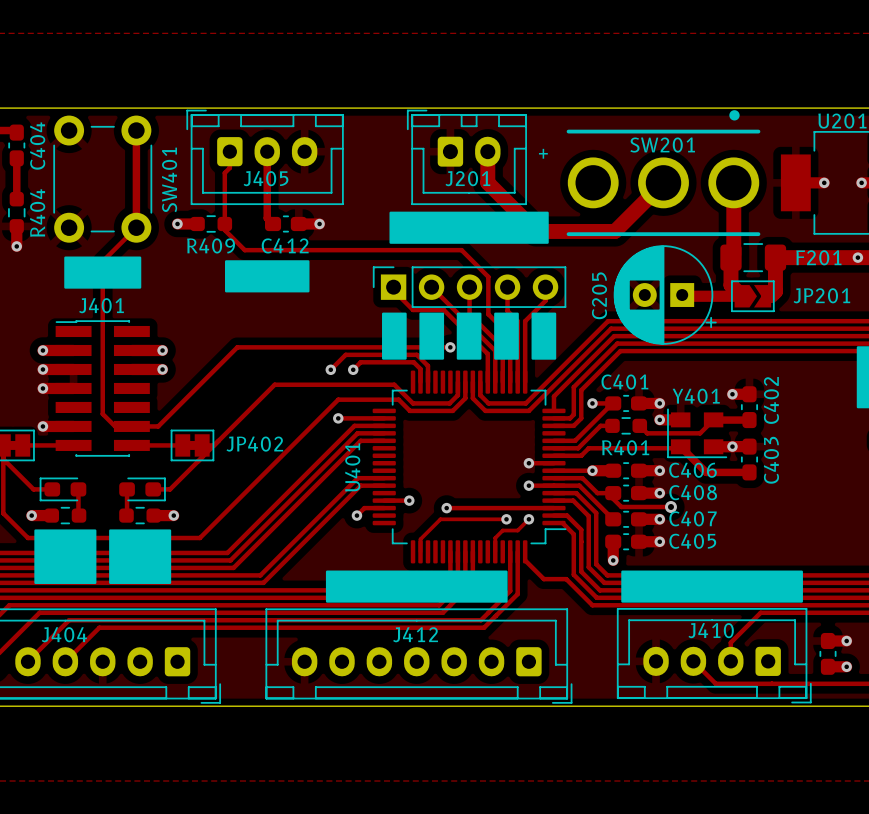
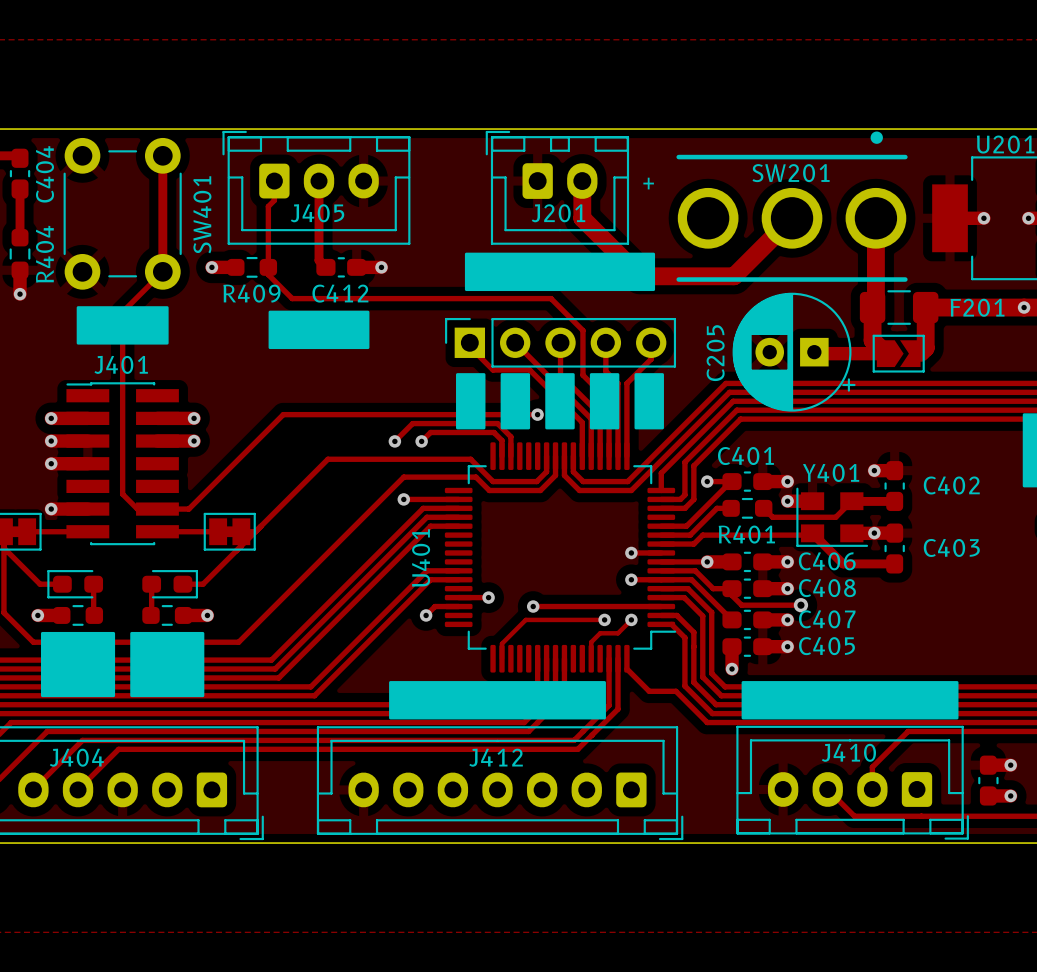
JP201 name: JP201 (821, 295) -> none
C402 name rotation: 0° (771, 400) -> 90° clockwise (951, 485)
JP402 name: JP402 (254, 444) -> none
C403 name rotation: 0° (771, 460) -> 90° clockwise (951, 547)

